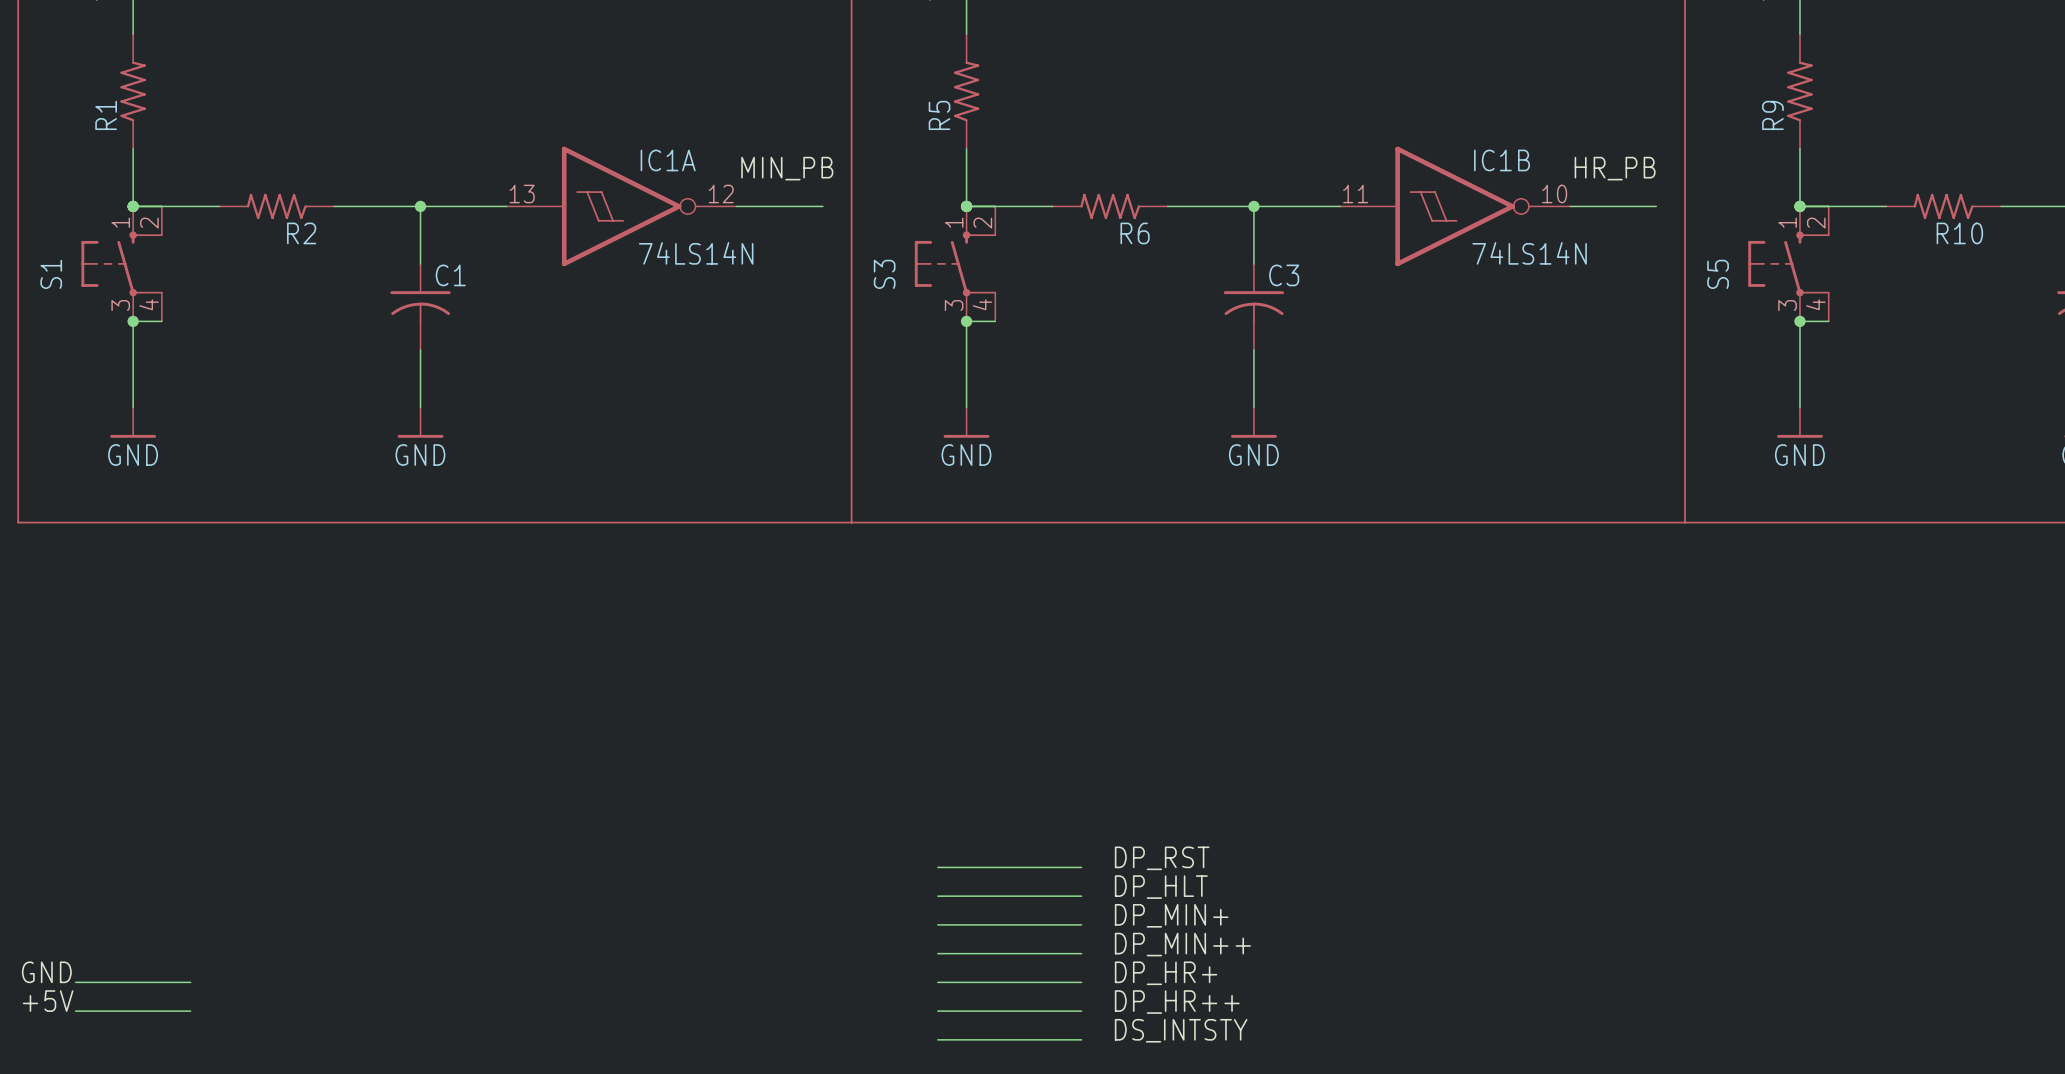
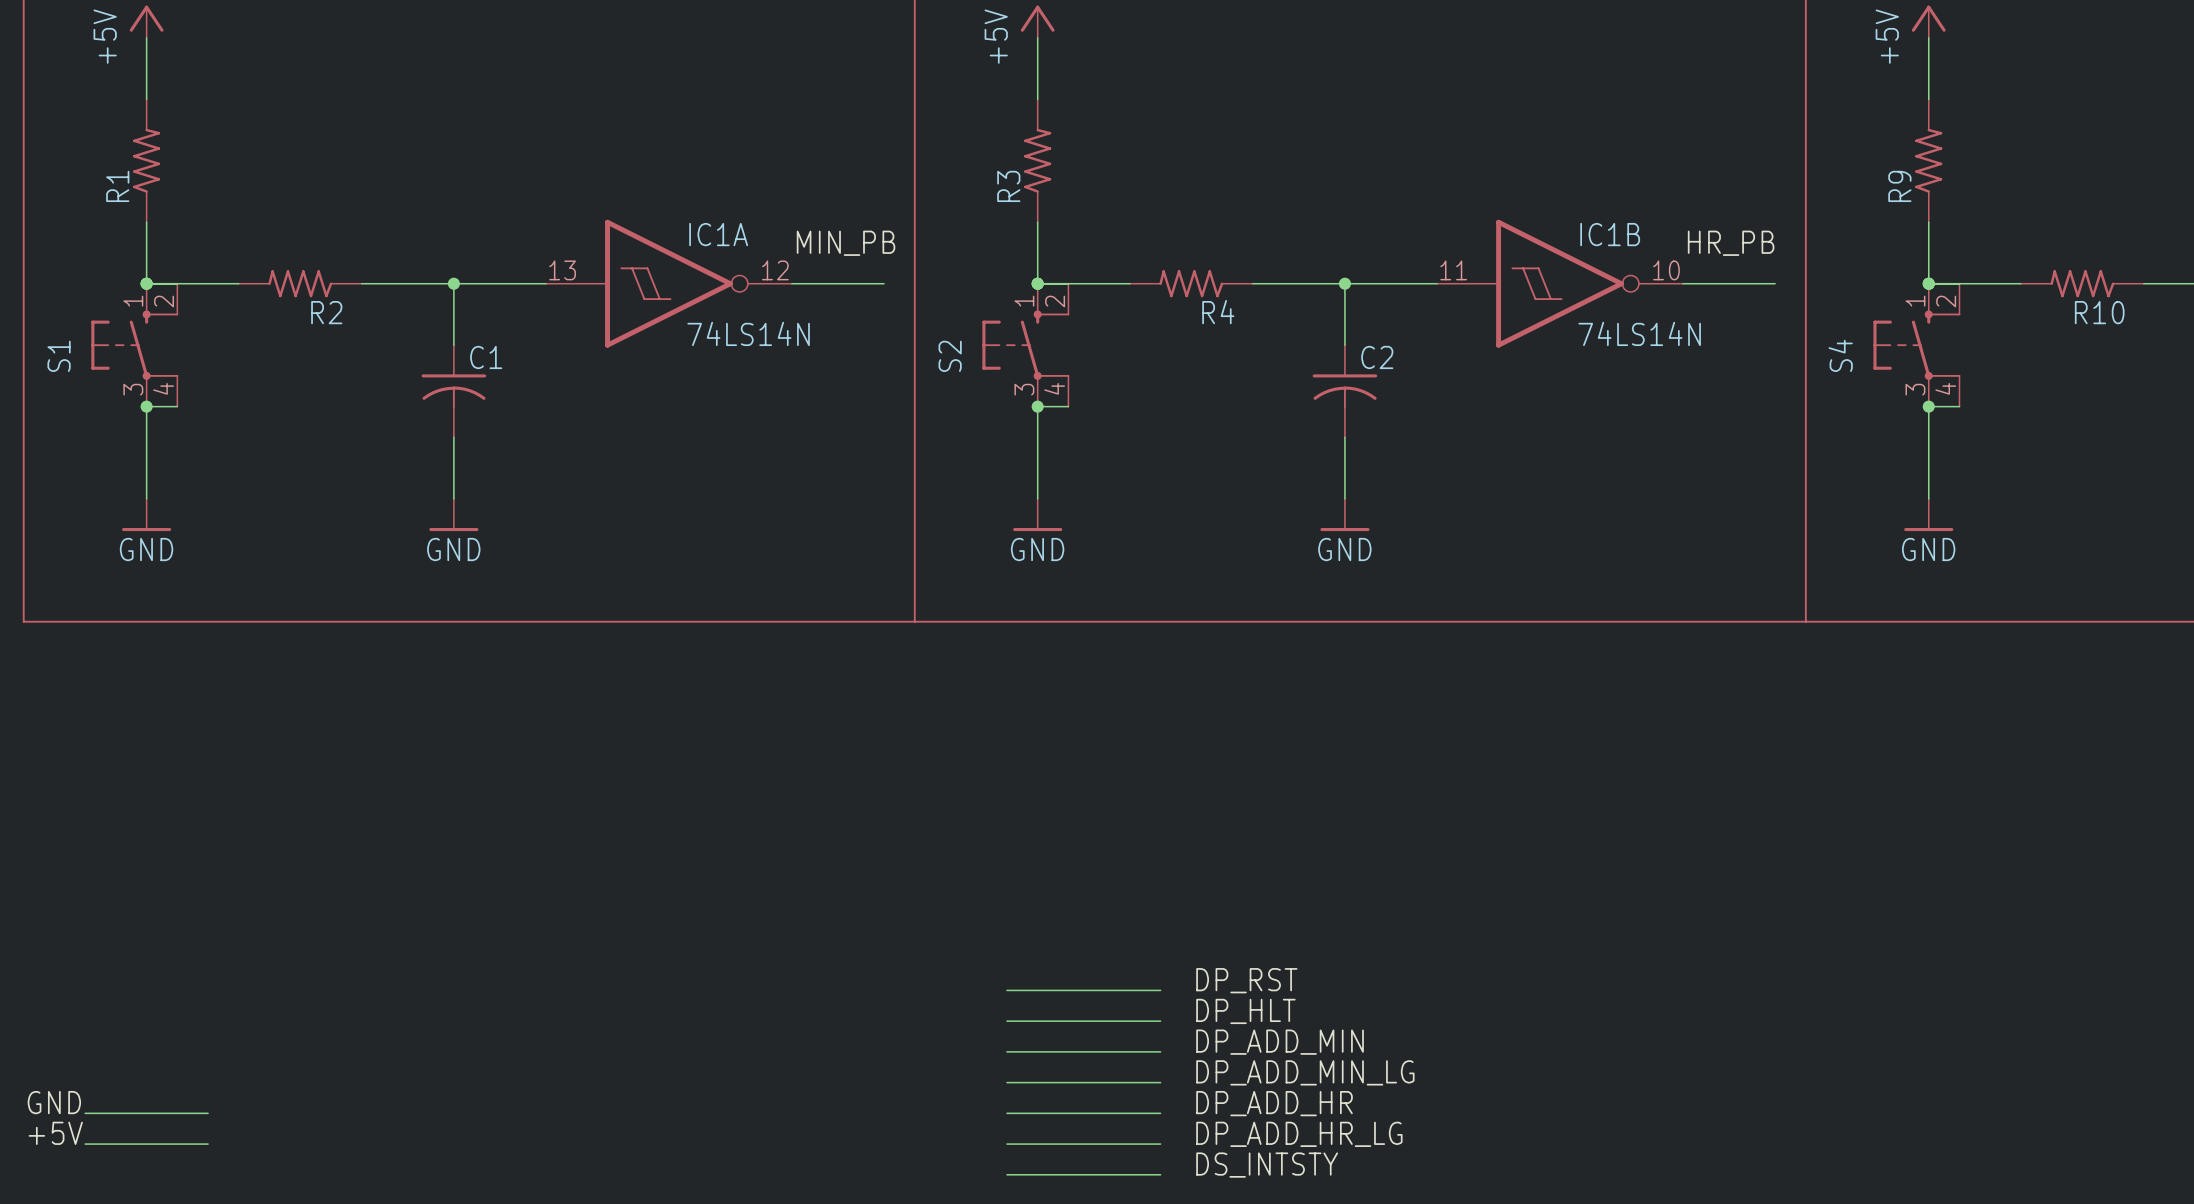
R5 name: R5 (939, 115) -> R3 (1008, 186)
R6 name: R6 (1135, 233) -> R4 (1218, 312)
S3 name: S3 (884, 274) -> S2 (950, 356)
S5 name: S5 (1718, 274) -> S4 (1840, 355)
C3 name: C3 (1284, 275) -> C2 (1377, 357)
label: DP_MIN+ (1171, 915) -> DP_ADD_MIN (1280, 1042)
label: DP_MIN++ (1182, 944) -> DP_ADD_MIN_LG (1305, 1072)
label: DP_HR+ (1166, 973) -> DP_ADD_HR (1274, 1103)
label: DP_HR++ (1177, 1002) -> DP_ADD_HR_LG (1299, 1134)

